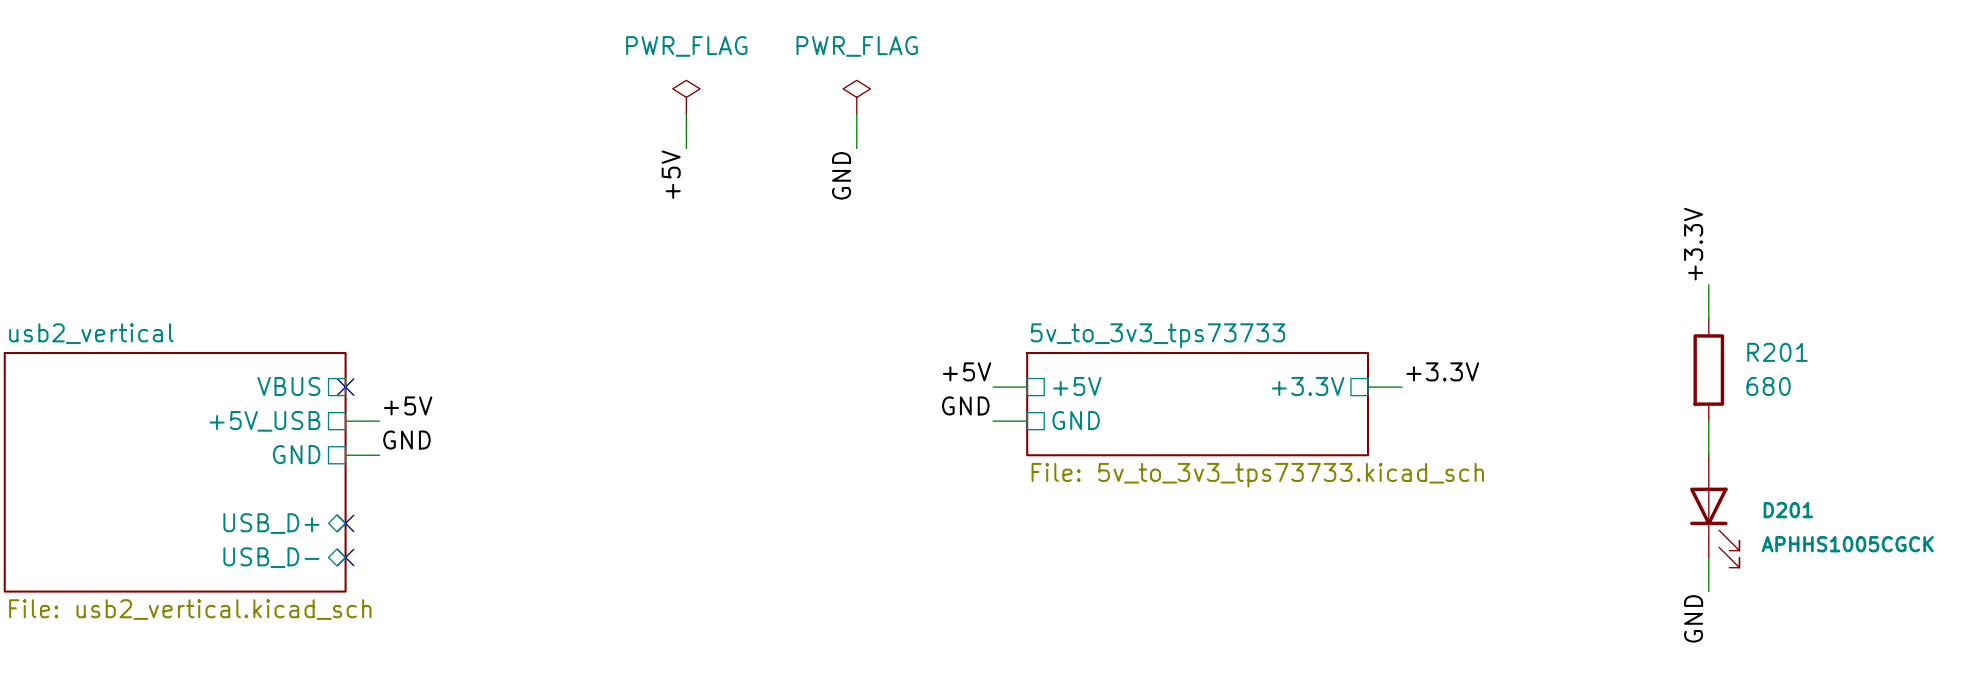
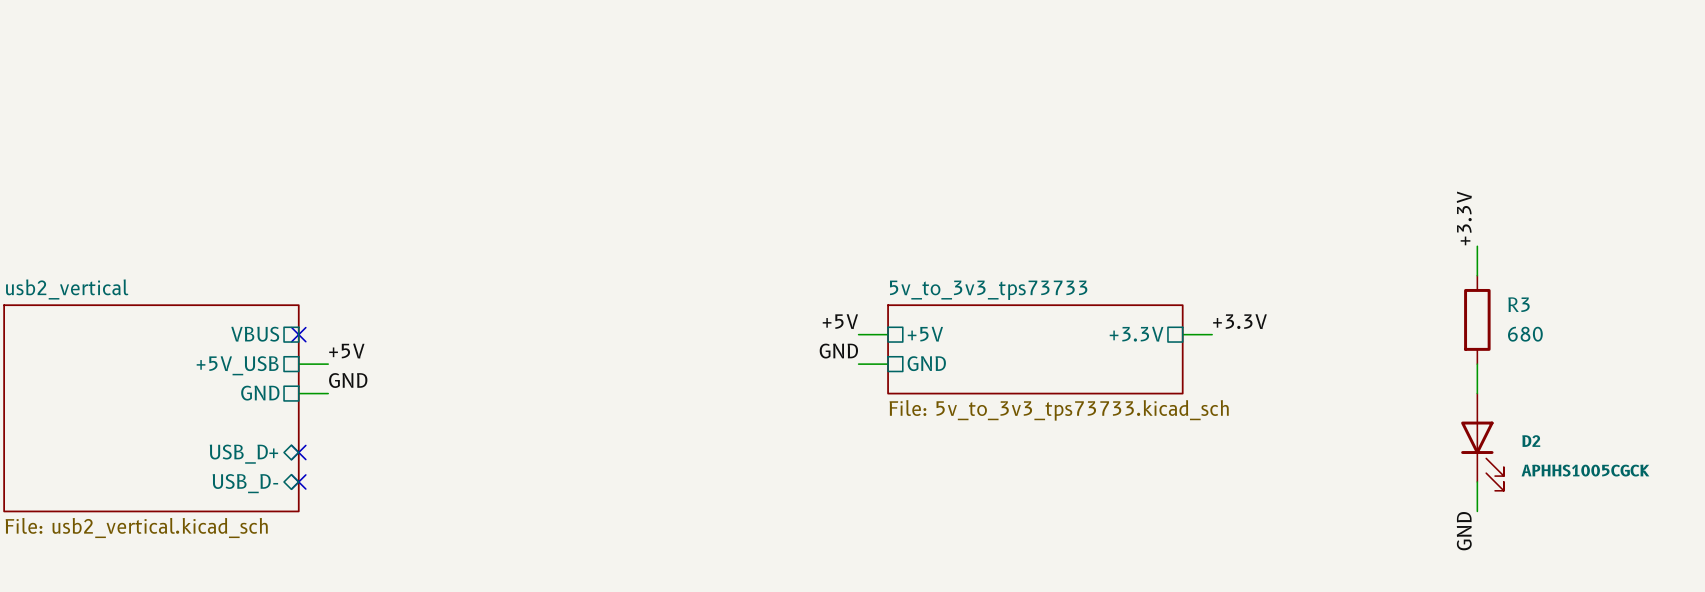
power symbol: PWR_FLAG (686, 97) -> none
power symbol: PWR_FLAG (856, 97) -> none
wire: (686, 114) (686, 148) -> none
wire: (856, 114) (856, 148) -> none
label: +5V (671, 174) -> none
label: GND (841, 175) -> none
R201 name: R201 (1777, 352) -> R3 (1518, 304)
D201 name: D201 (1788, 510) -> D2 (1531, 441)

